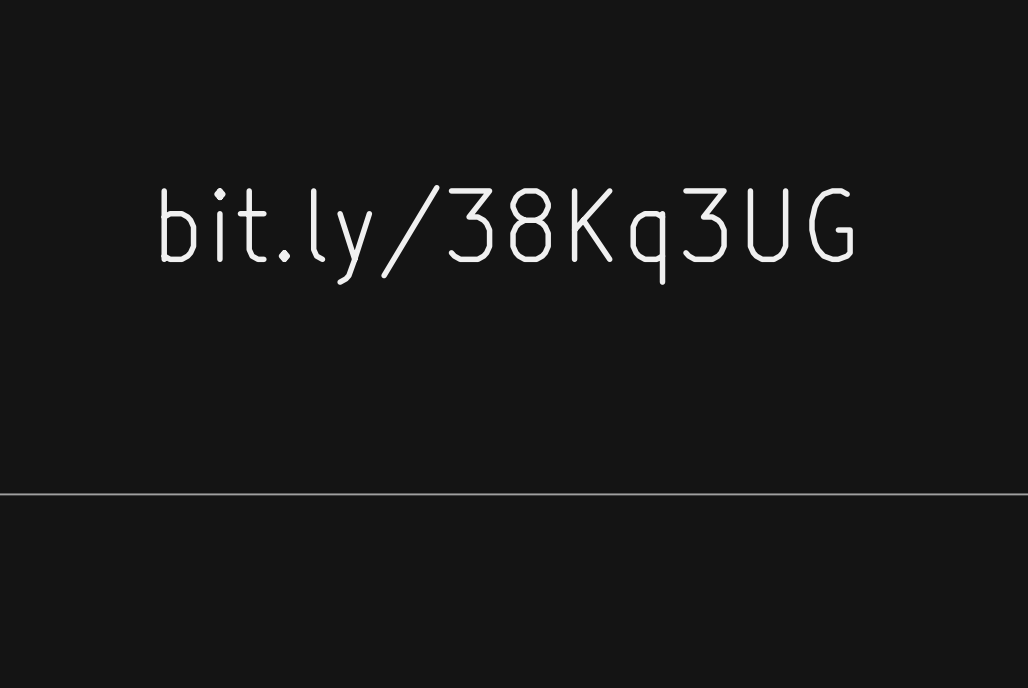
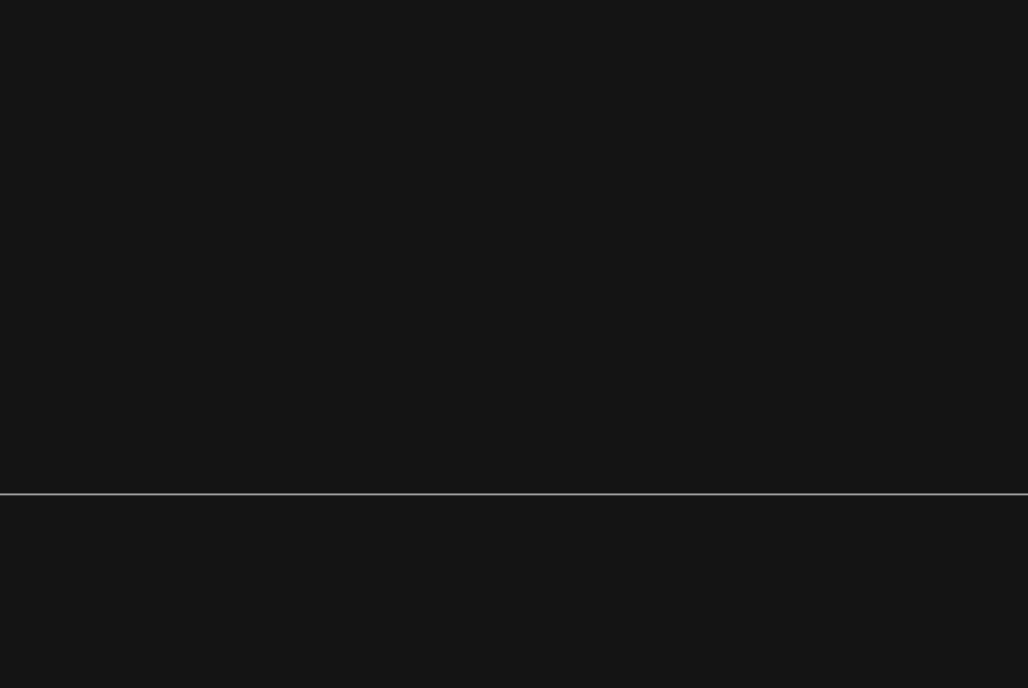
text: bit.ly/38Kq3UG (507, 234) -> none

